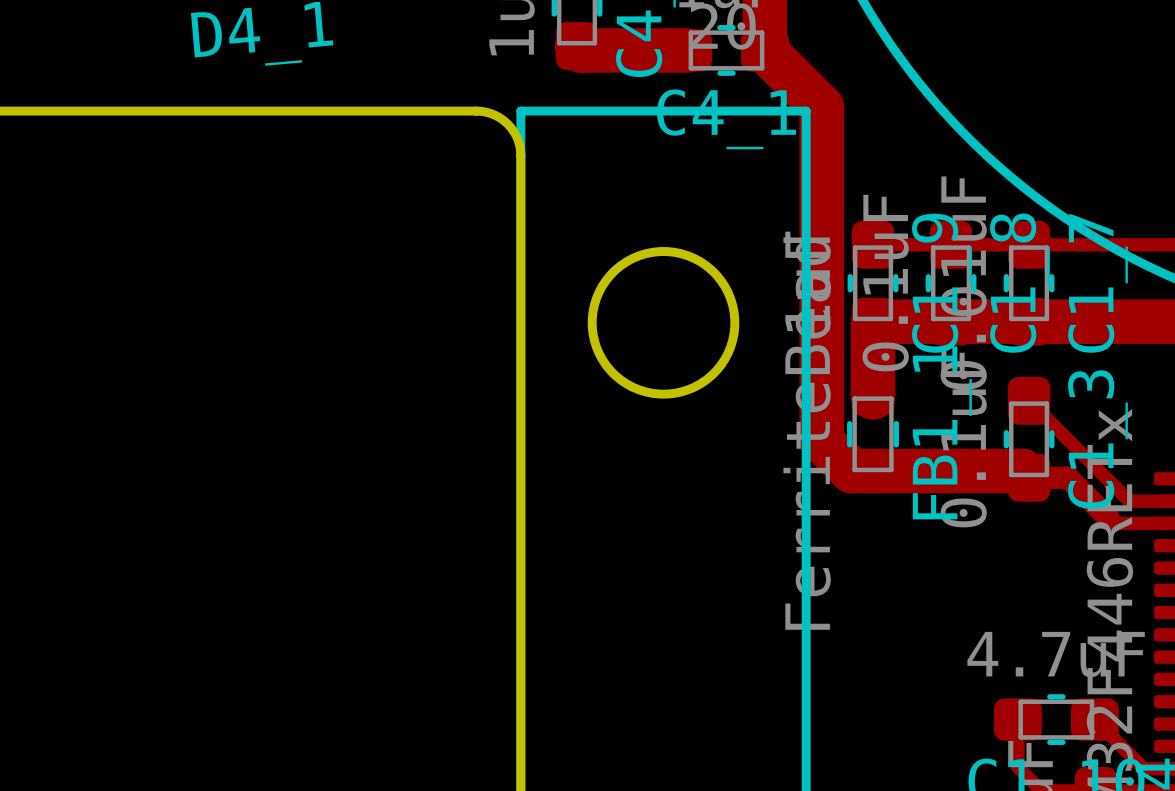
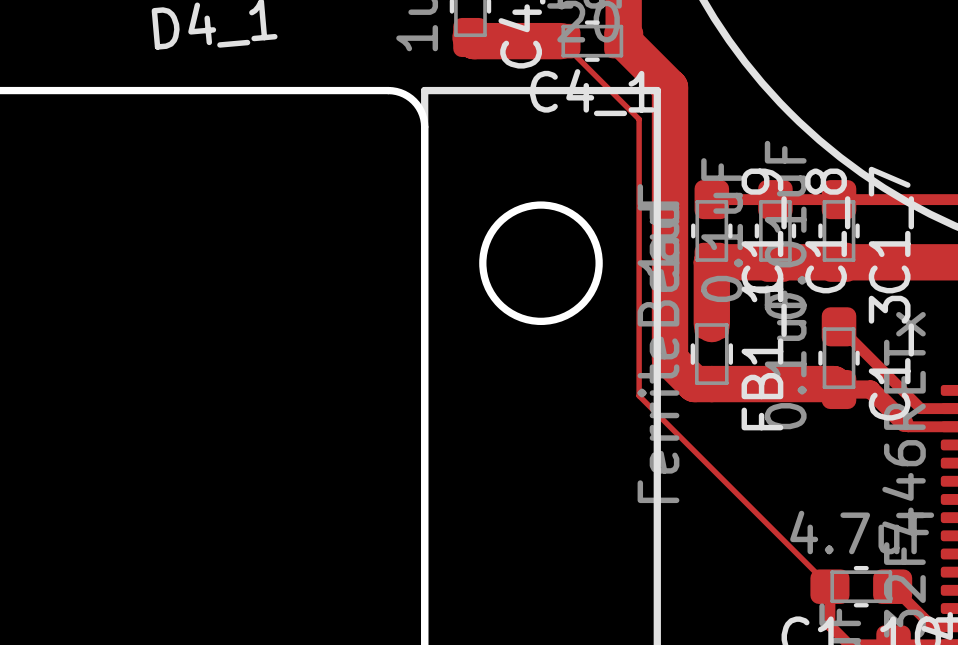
top track: none -> (560, 41) (639, 119) (639, 395) (829, 586)

